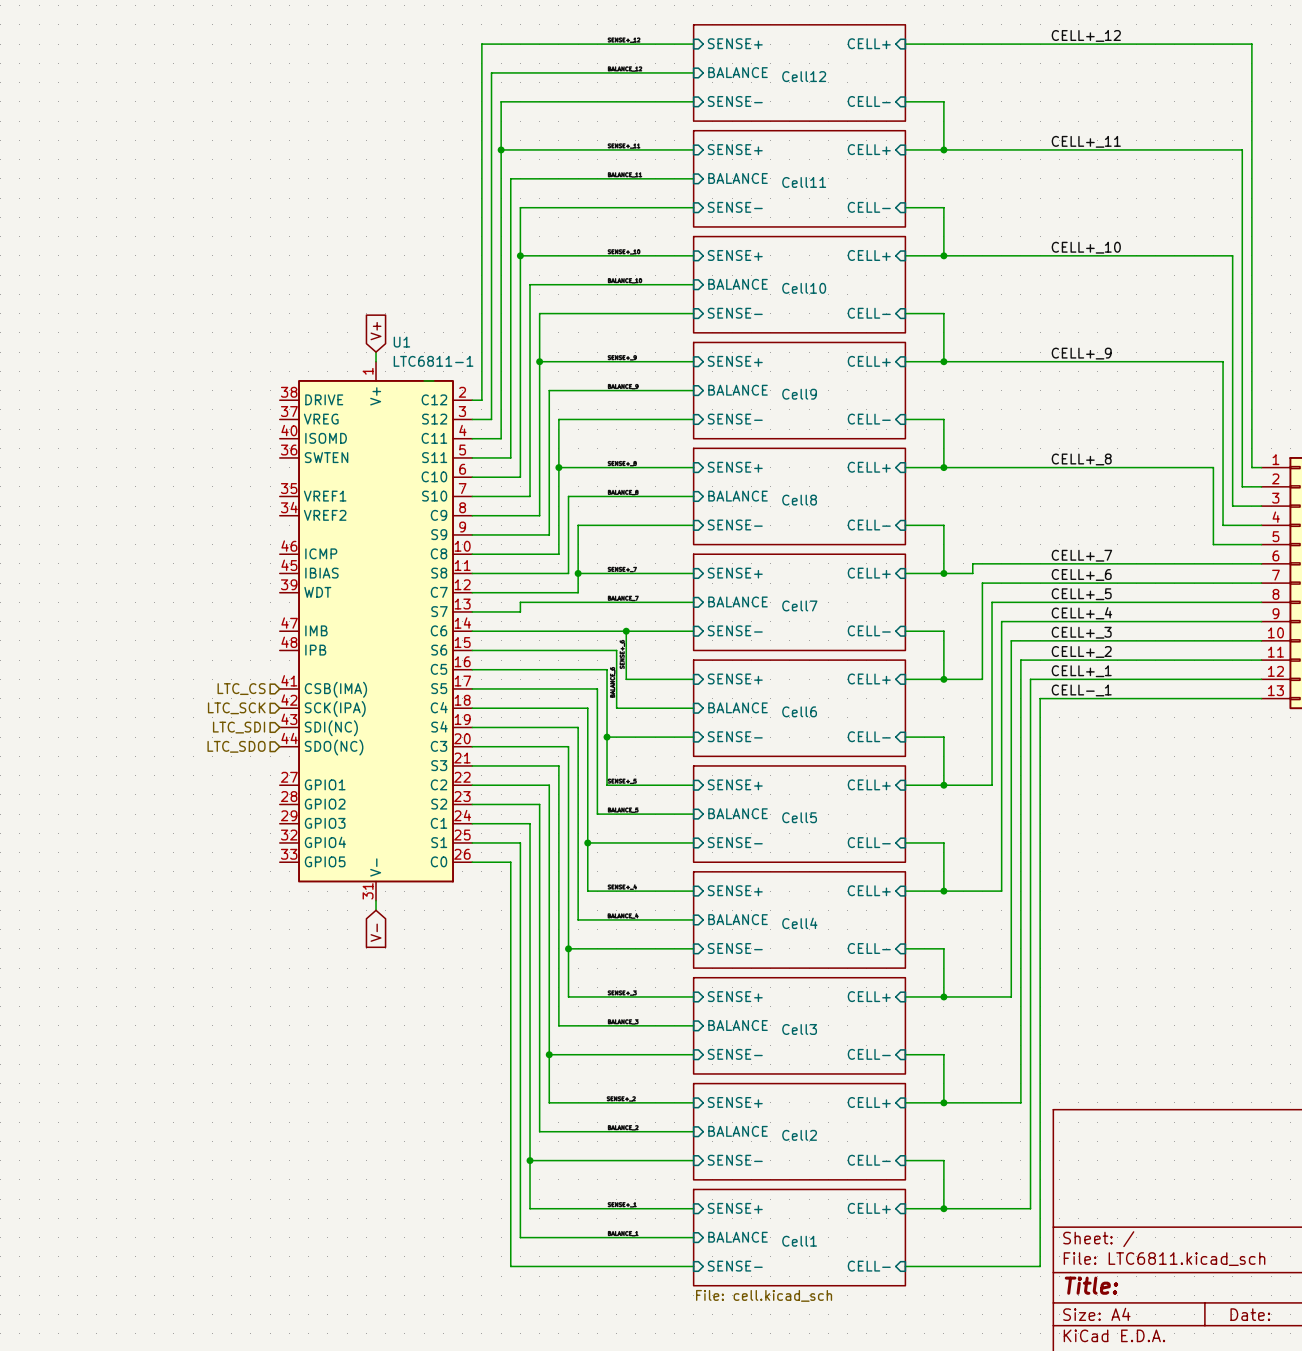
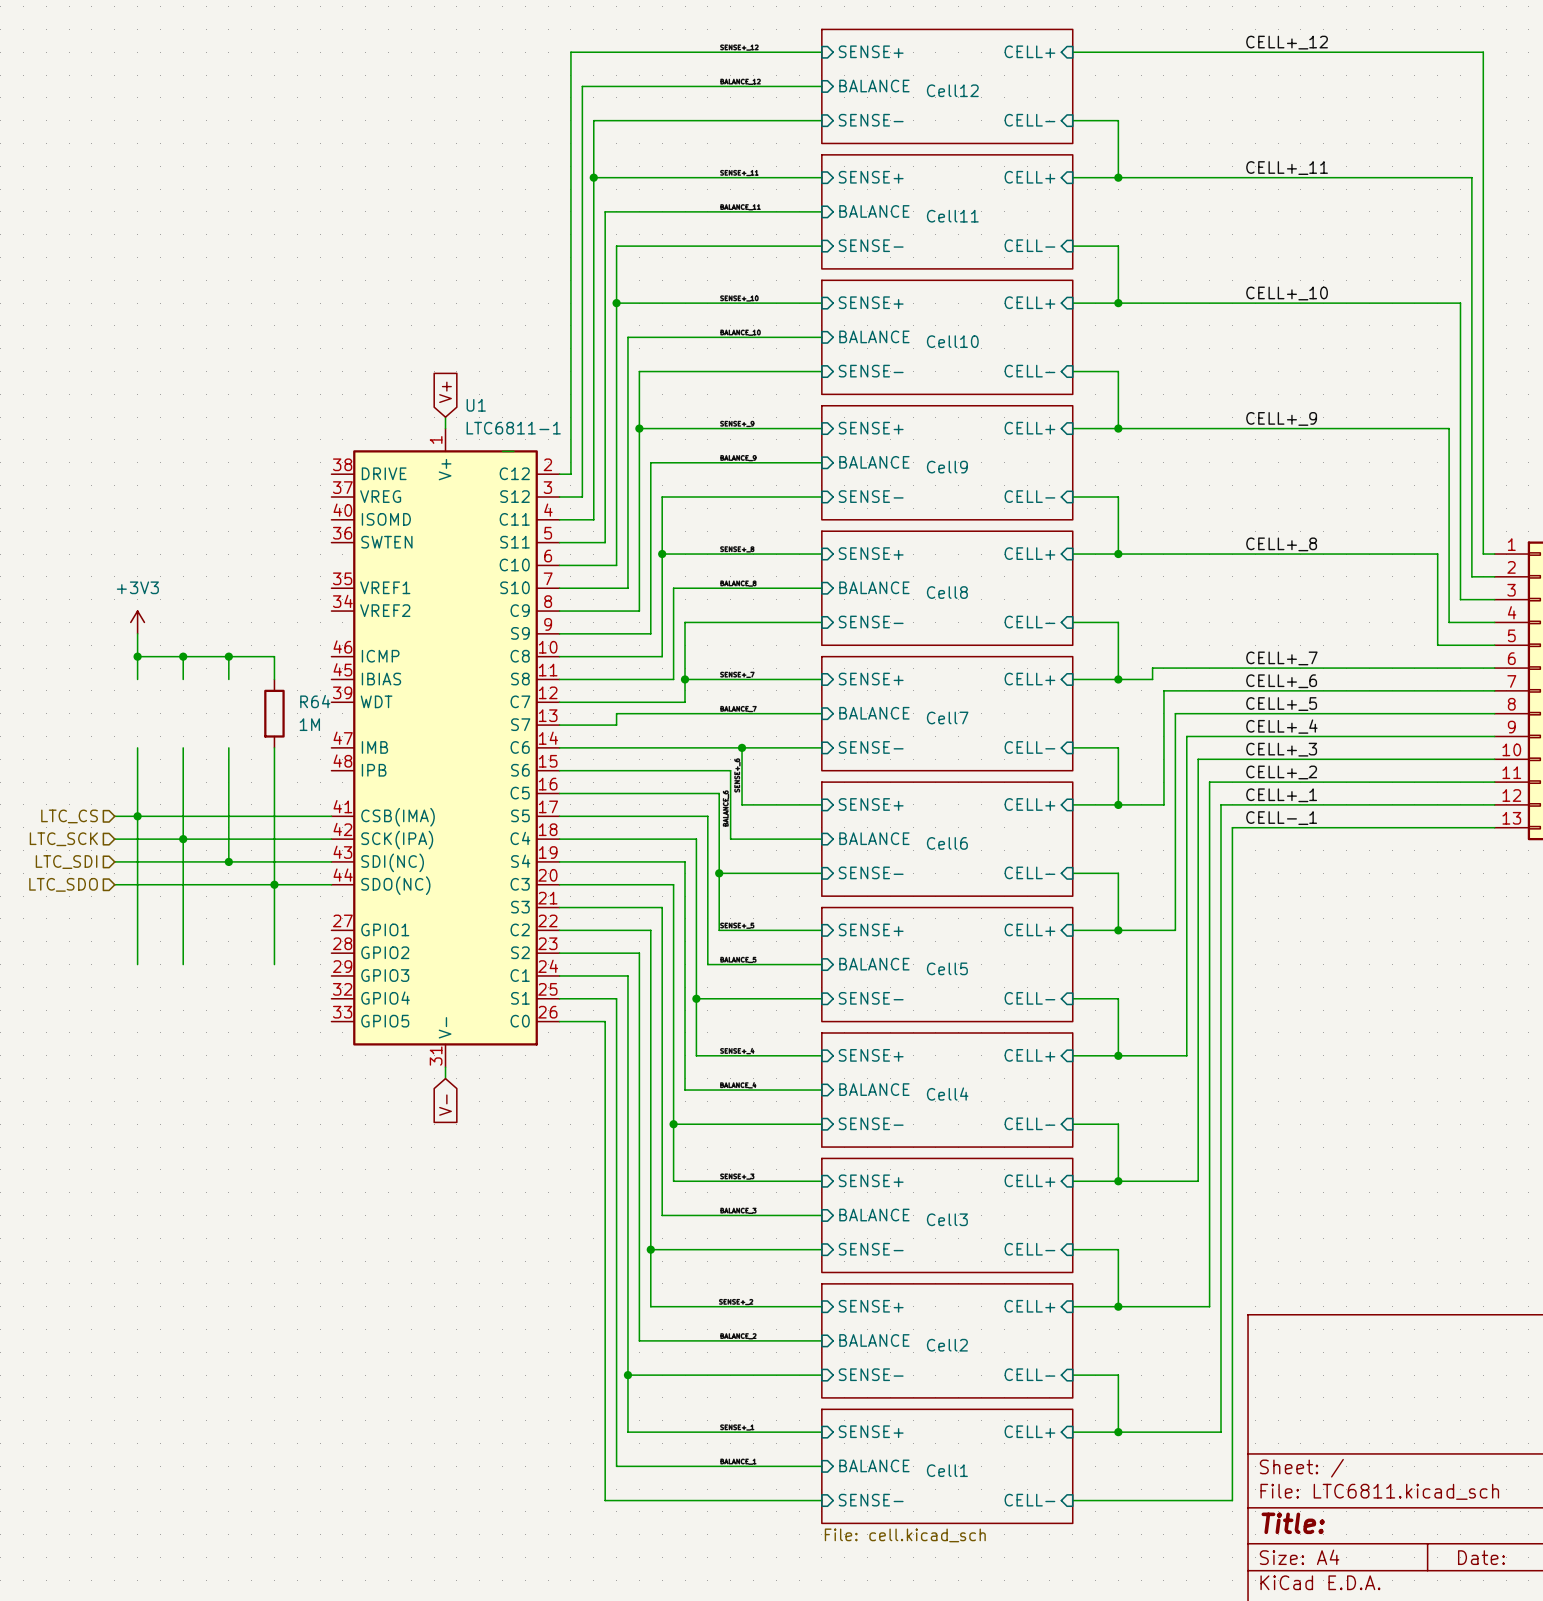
power symbol: none -> +3V3 (137, 622)
wire: none -> (137, 633) (137, 679)
wire: none -> (137, 656) (274, 656) (274, 679)
junction: none -> (137, 656)
wire: none -> (183, 656) (183, 679)
junction: none -> (183, 656)
wire: none -> (228, 656) (228, 679)
junction: none -> (228, 656)
R64: none -> 1M (274, 713)
wire: none -> (137, 747) (137, 964)
wire: none -> (183, 747) (183, 964)
wire: none -> (228, 747) (228, 861)
wire: none -> (274, 747) (274, 964)
wire: none -> (114, 816) (331, 816)
junction: none -> (137, 816)
hierarchical label position: LTC_CS (241, 689) -> LTC_CS (69, 816)
wire: none -> (114, 839) (331, 839)
junction: none -> (183, 839)
hierarchical label position: LTC_SCK (236, 708) -> LTC_SCK (63, 839)
wire: none -> (114, 861) (331, 861)
junction: none -> (228, 861)
hierarchical label position: LTC_SDI (239, 727) -> LTC_SDI (66, 862)
wire: none -> (114, 884) (331, 884)
junction: none -> (274, 884)
hierarchical label position: LTC_SDO (236, 746) -> LTC_SDO (63, 884)

